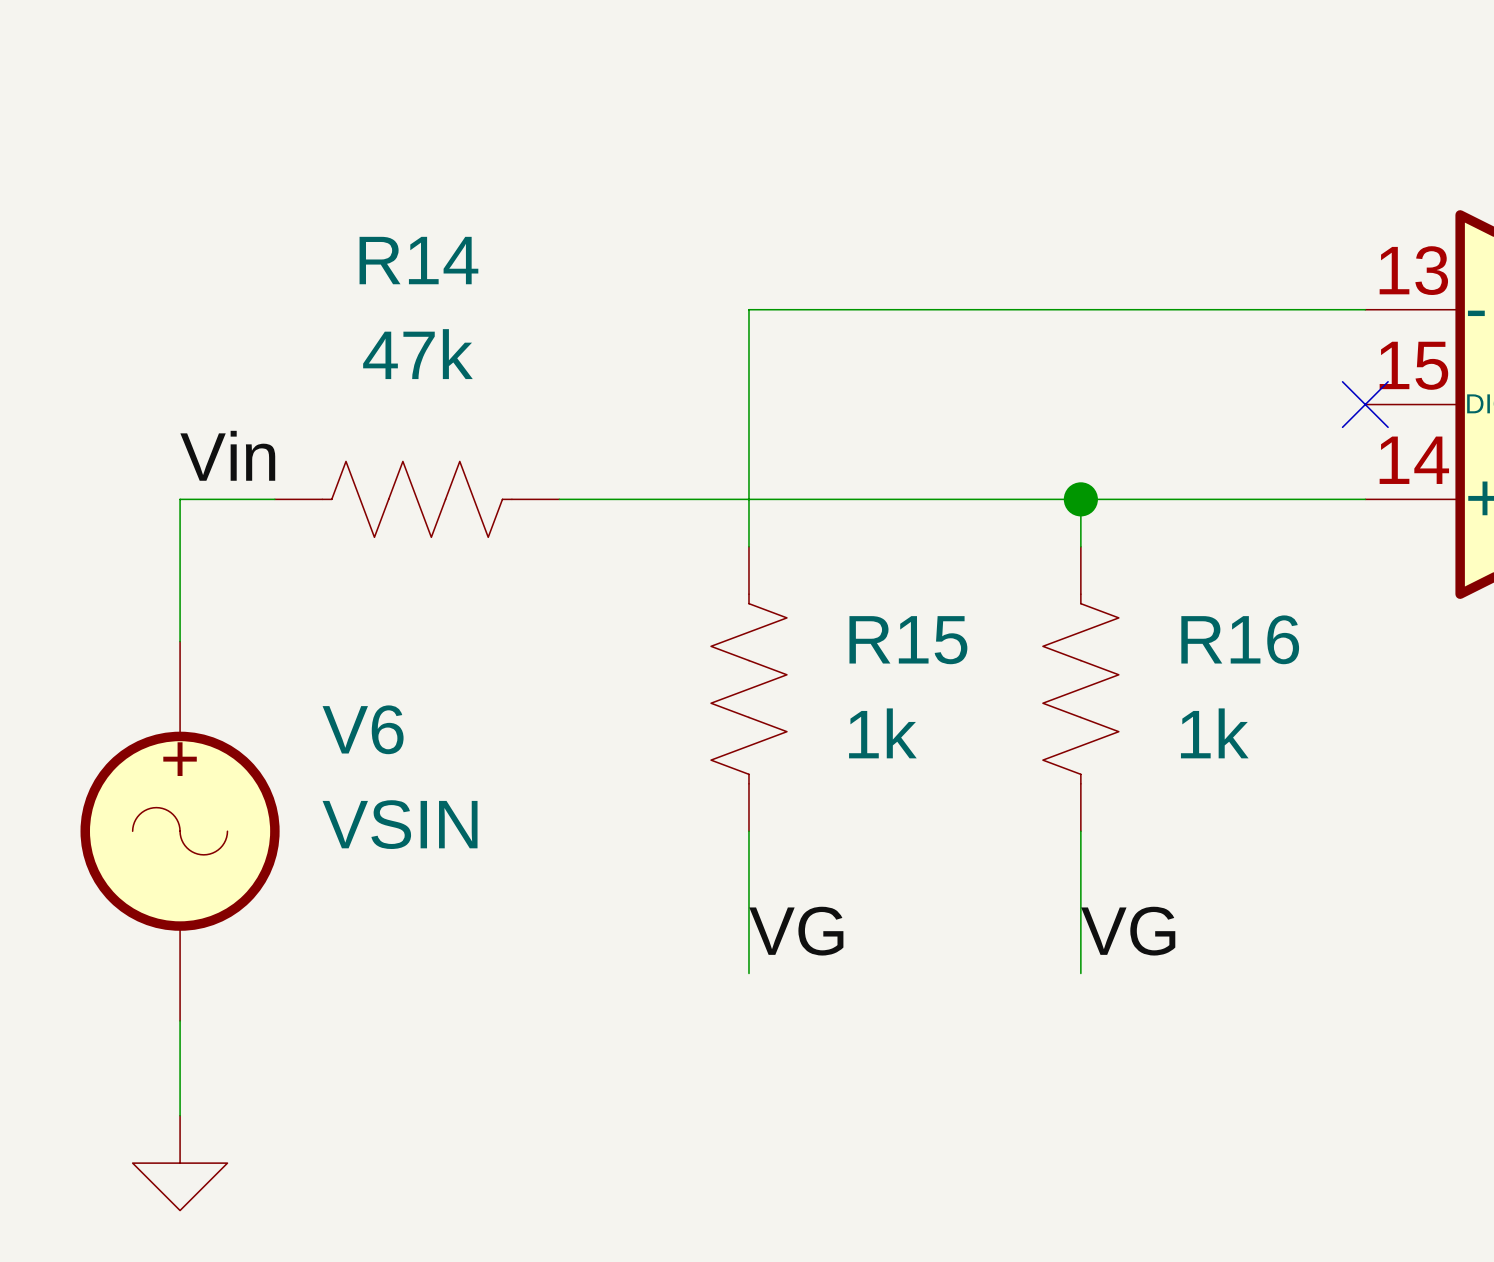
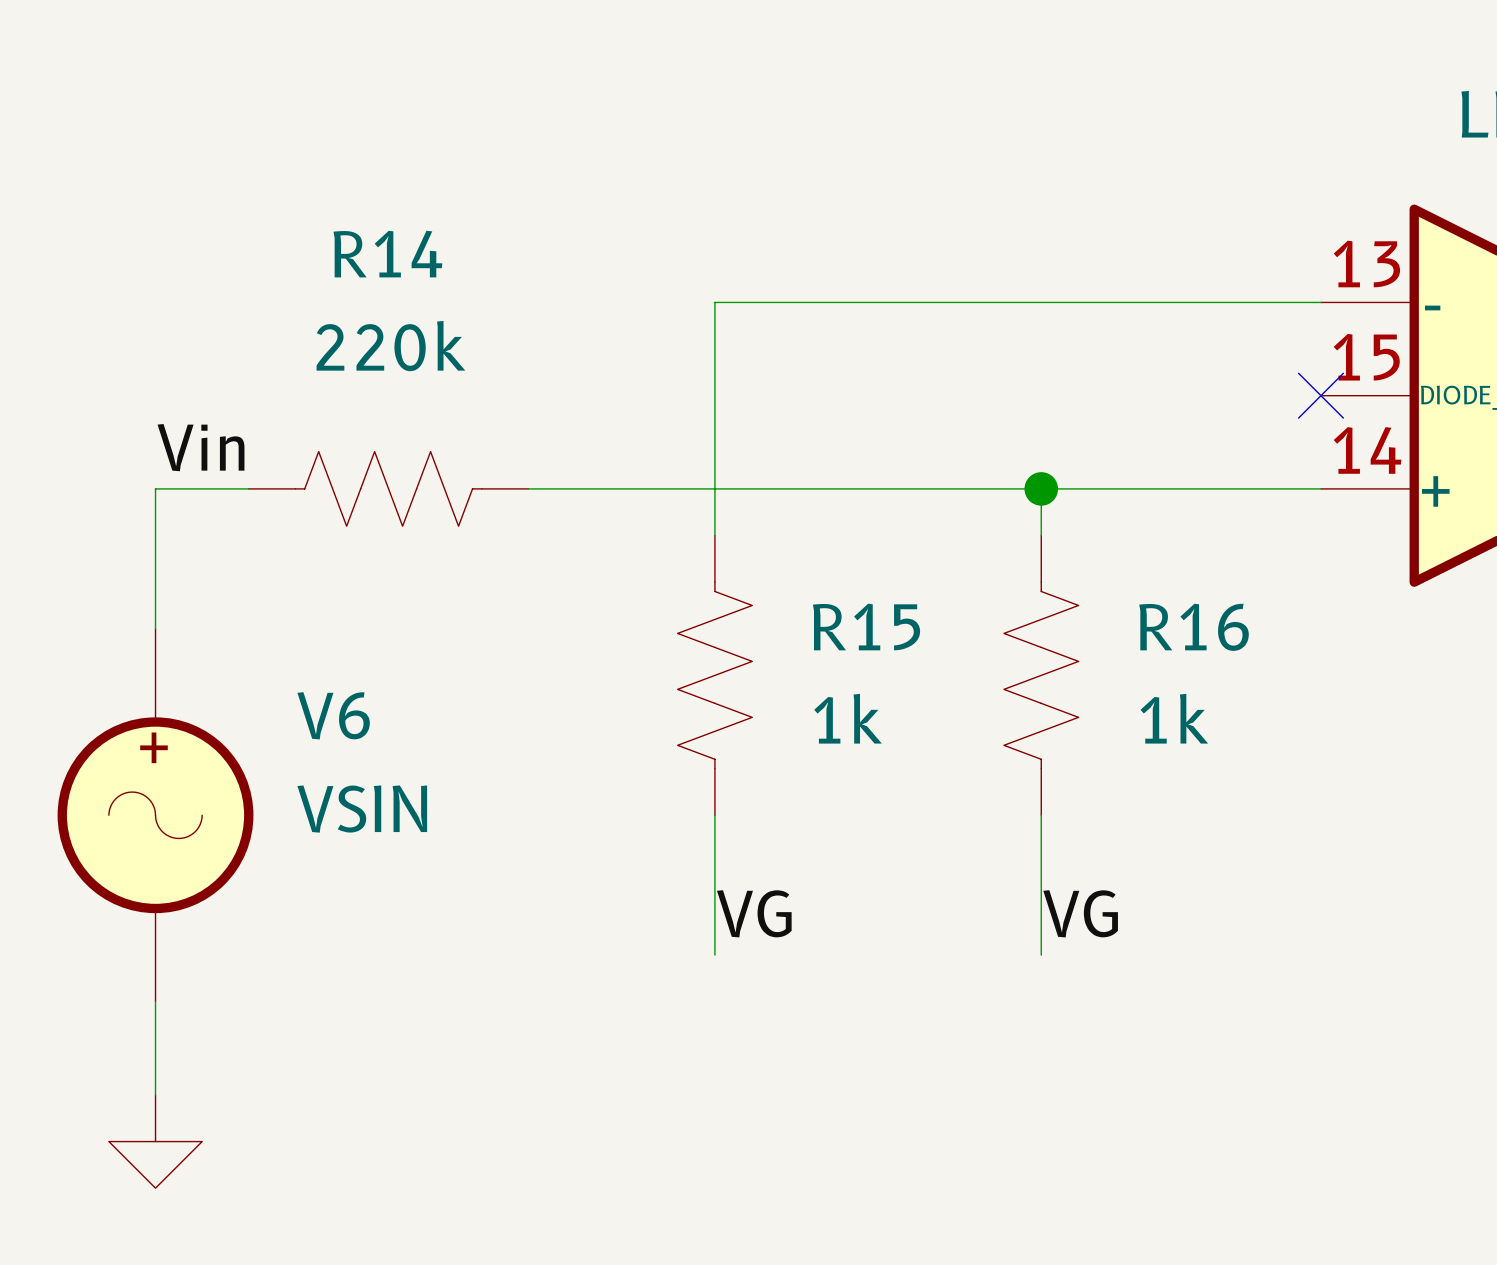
R14 value: 47k (417, 354) -> 220k (390, 346)

